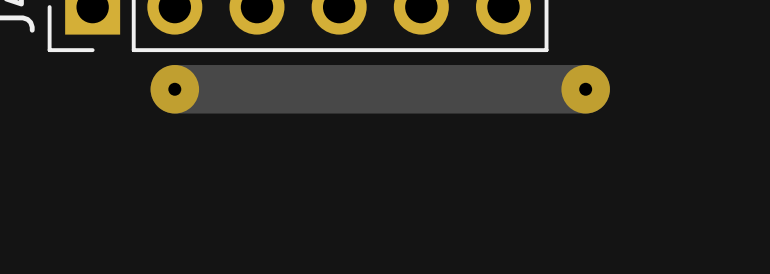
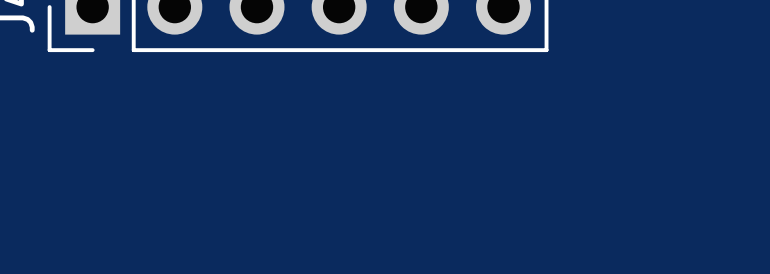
track: (174, 89) (585, 89) -> none
via: (174, 89) -> none
via: (585, 89) -> none

